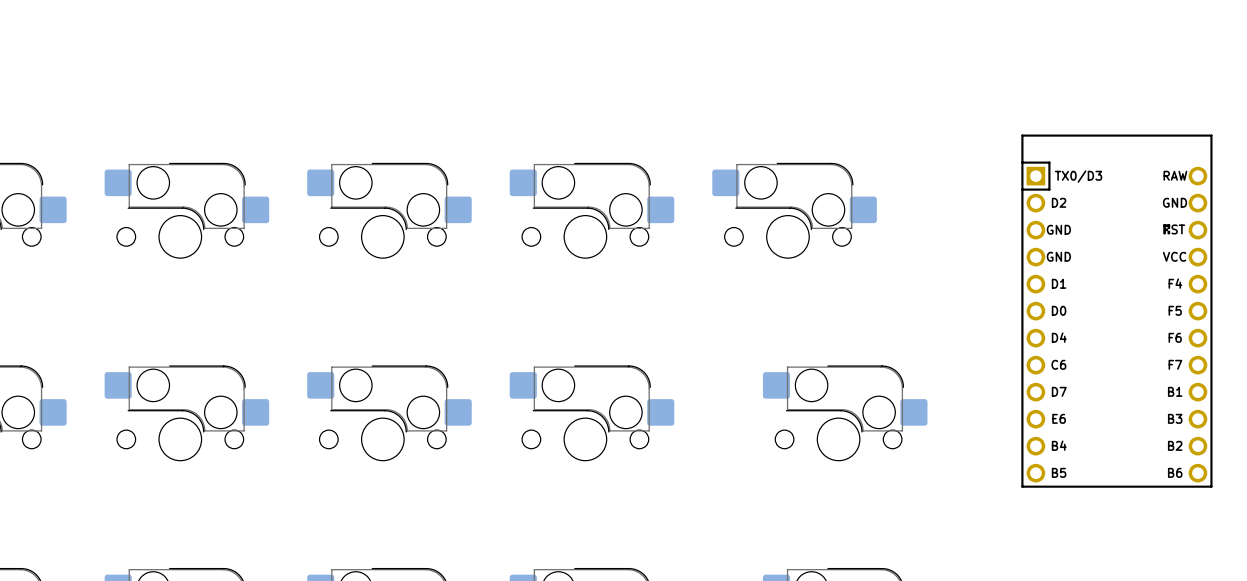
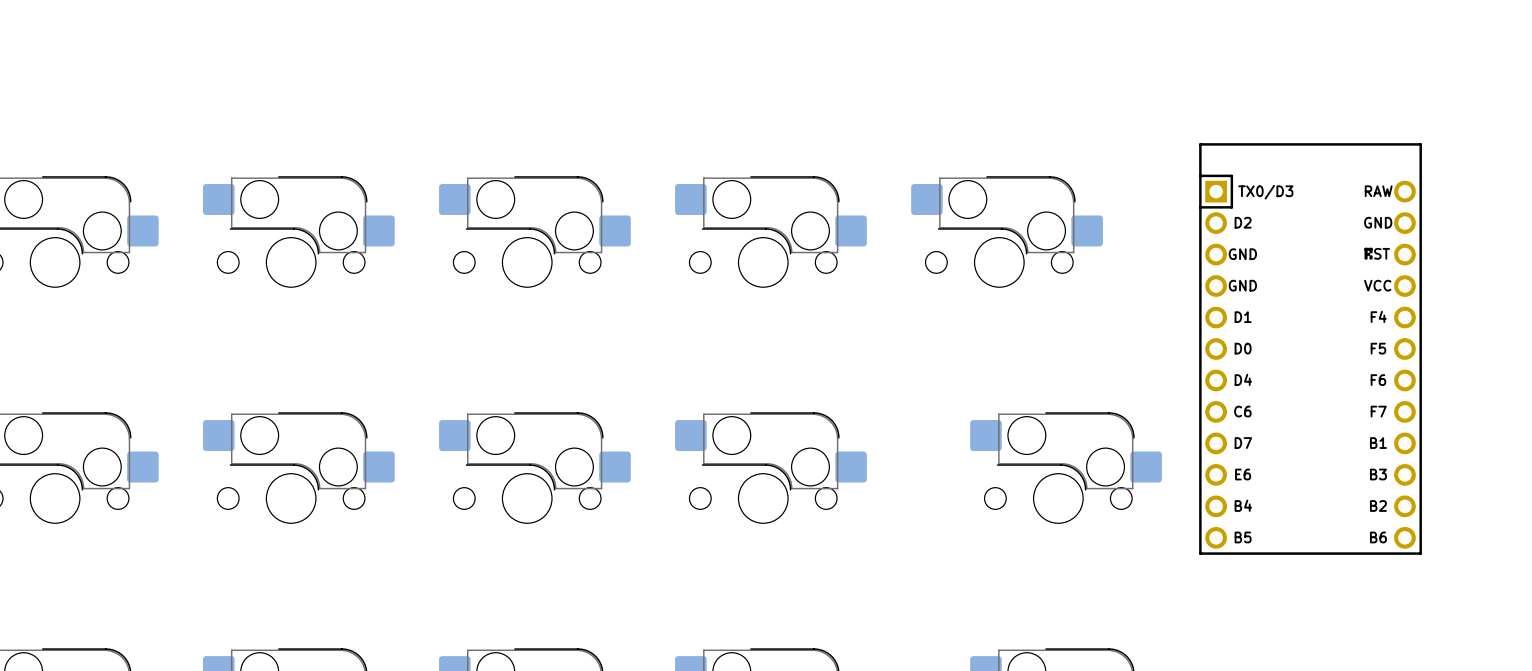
part position: (1116, 311) -> (1310, 348)

